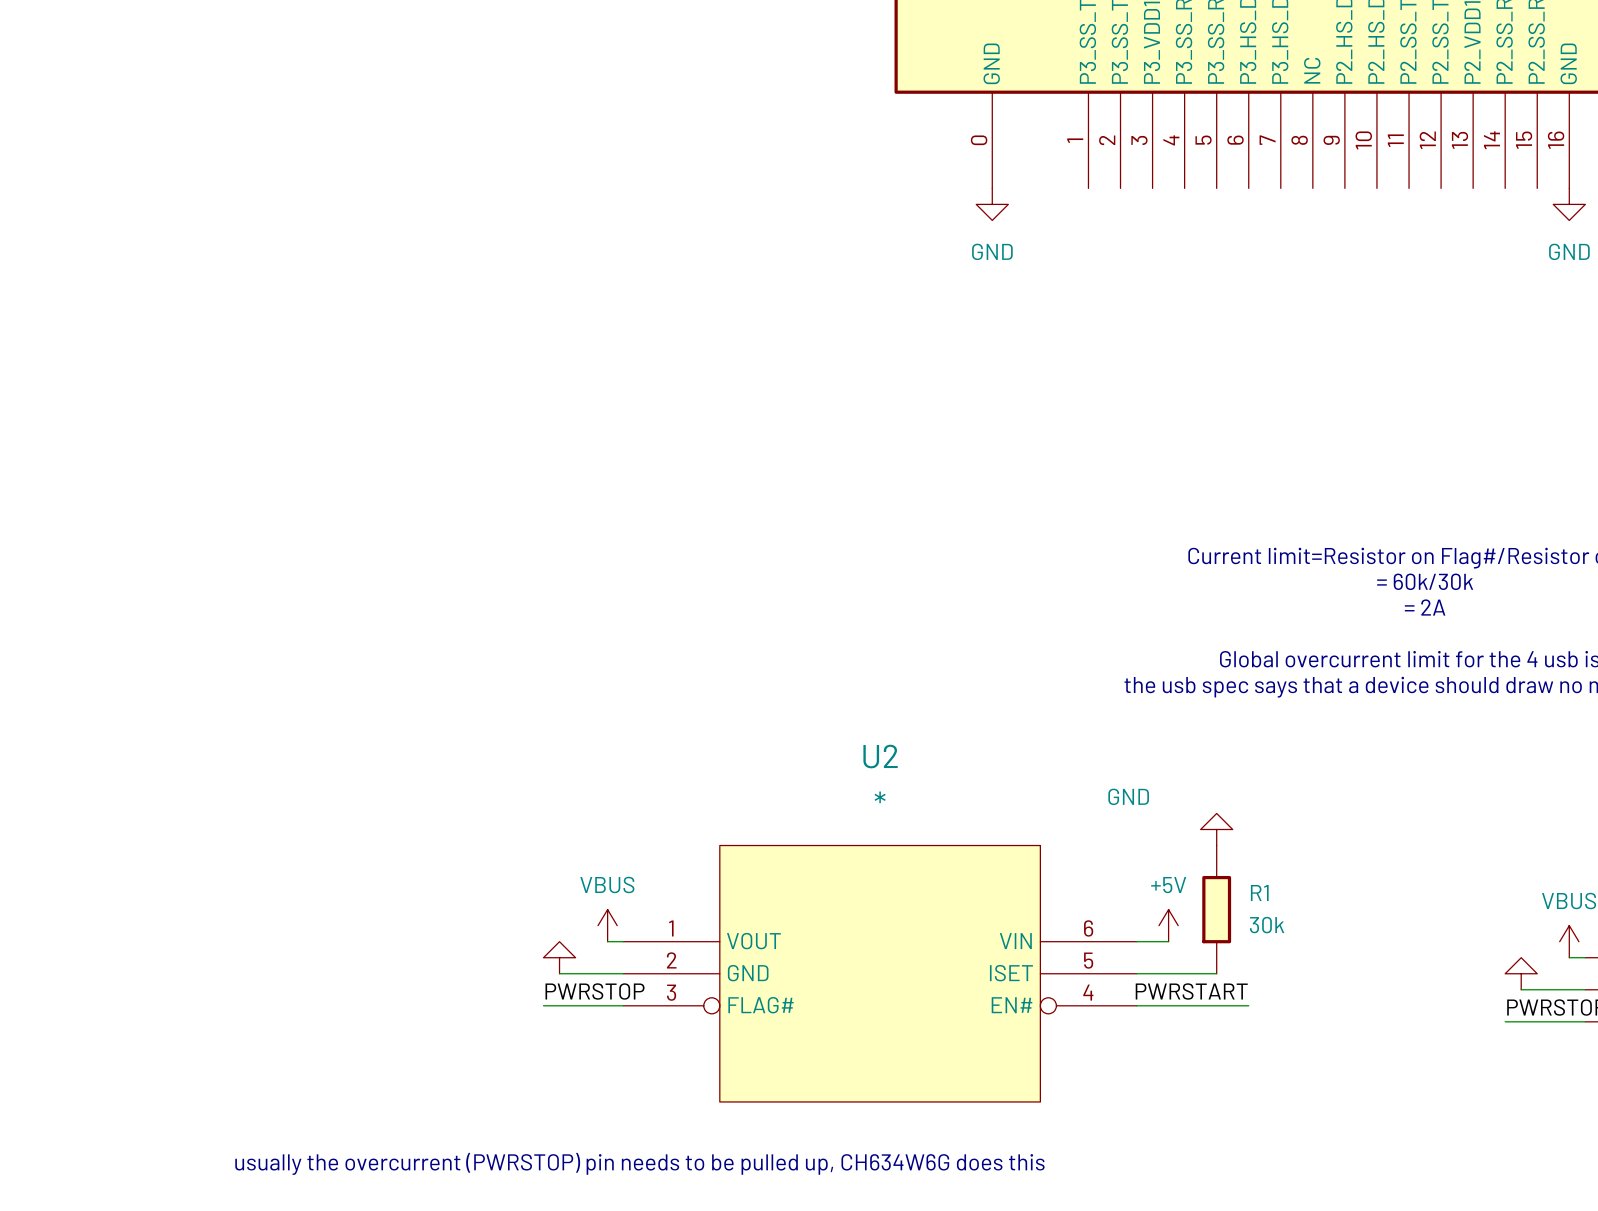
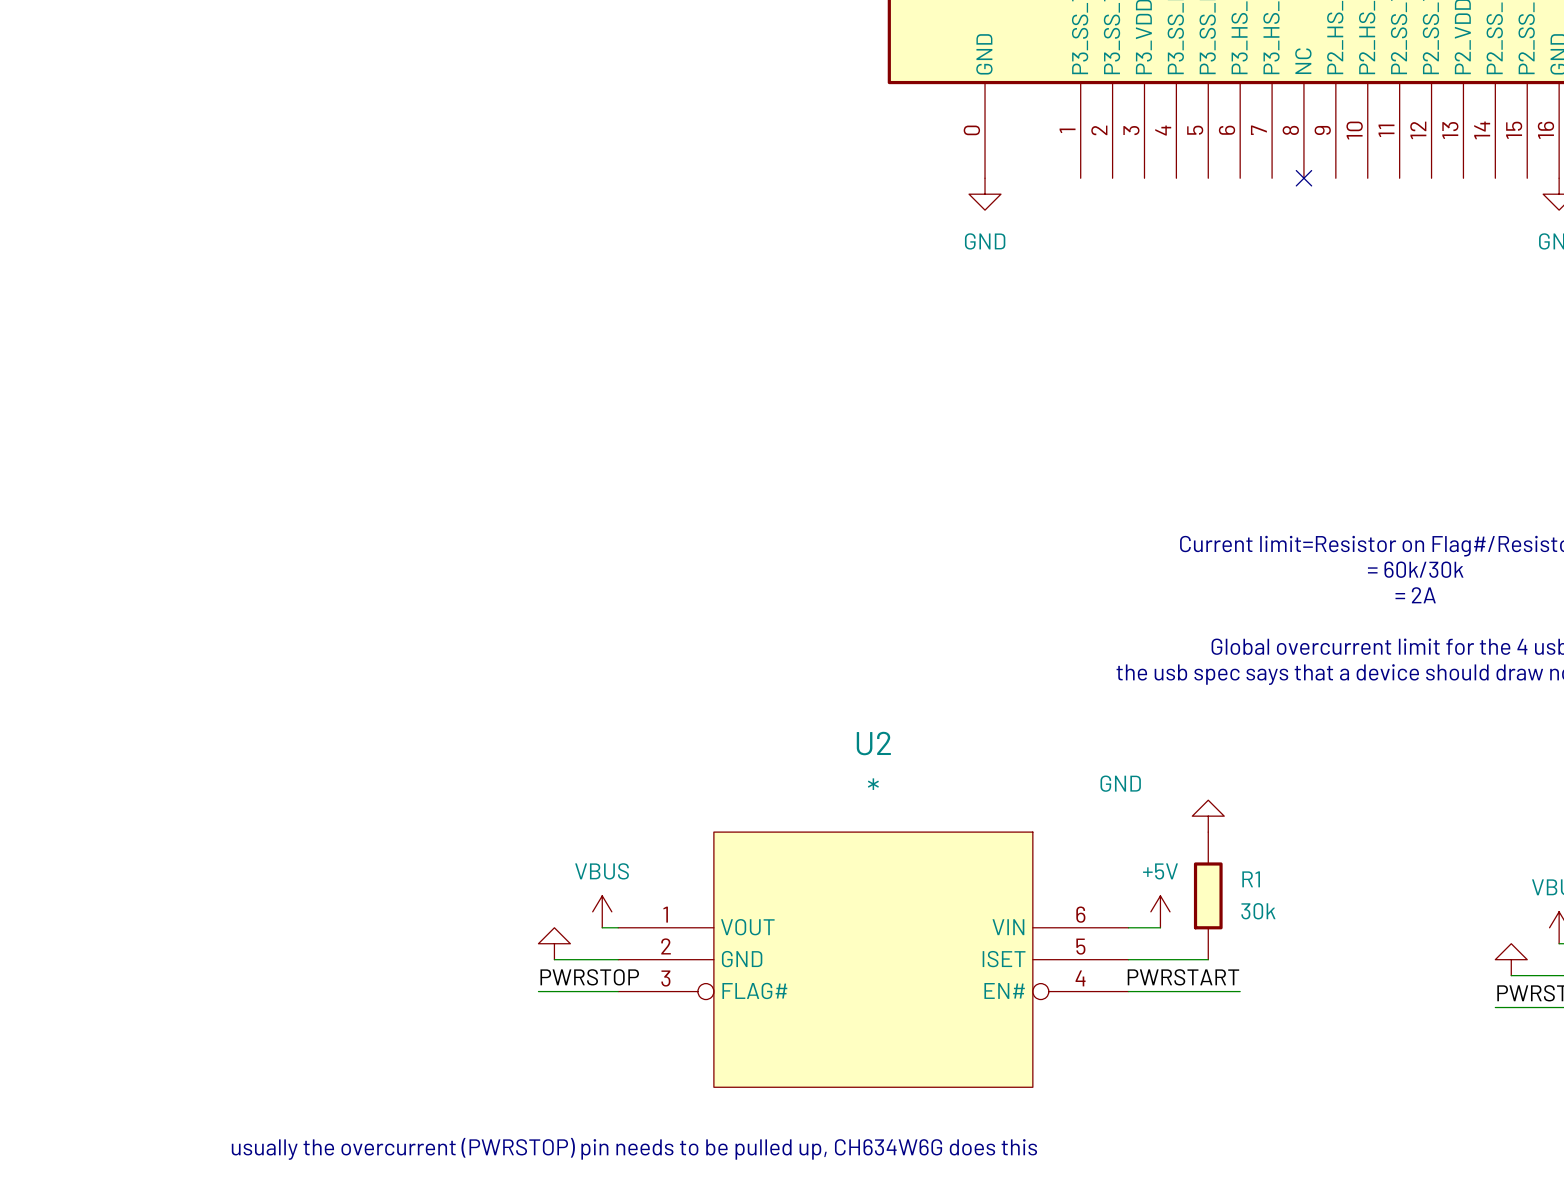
no-connect mark: none -> (1303, 178)

